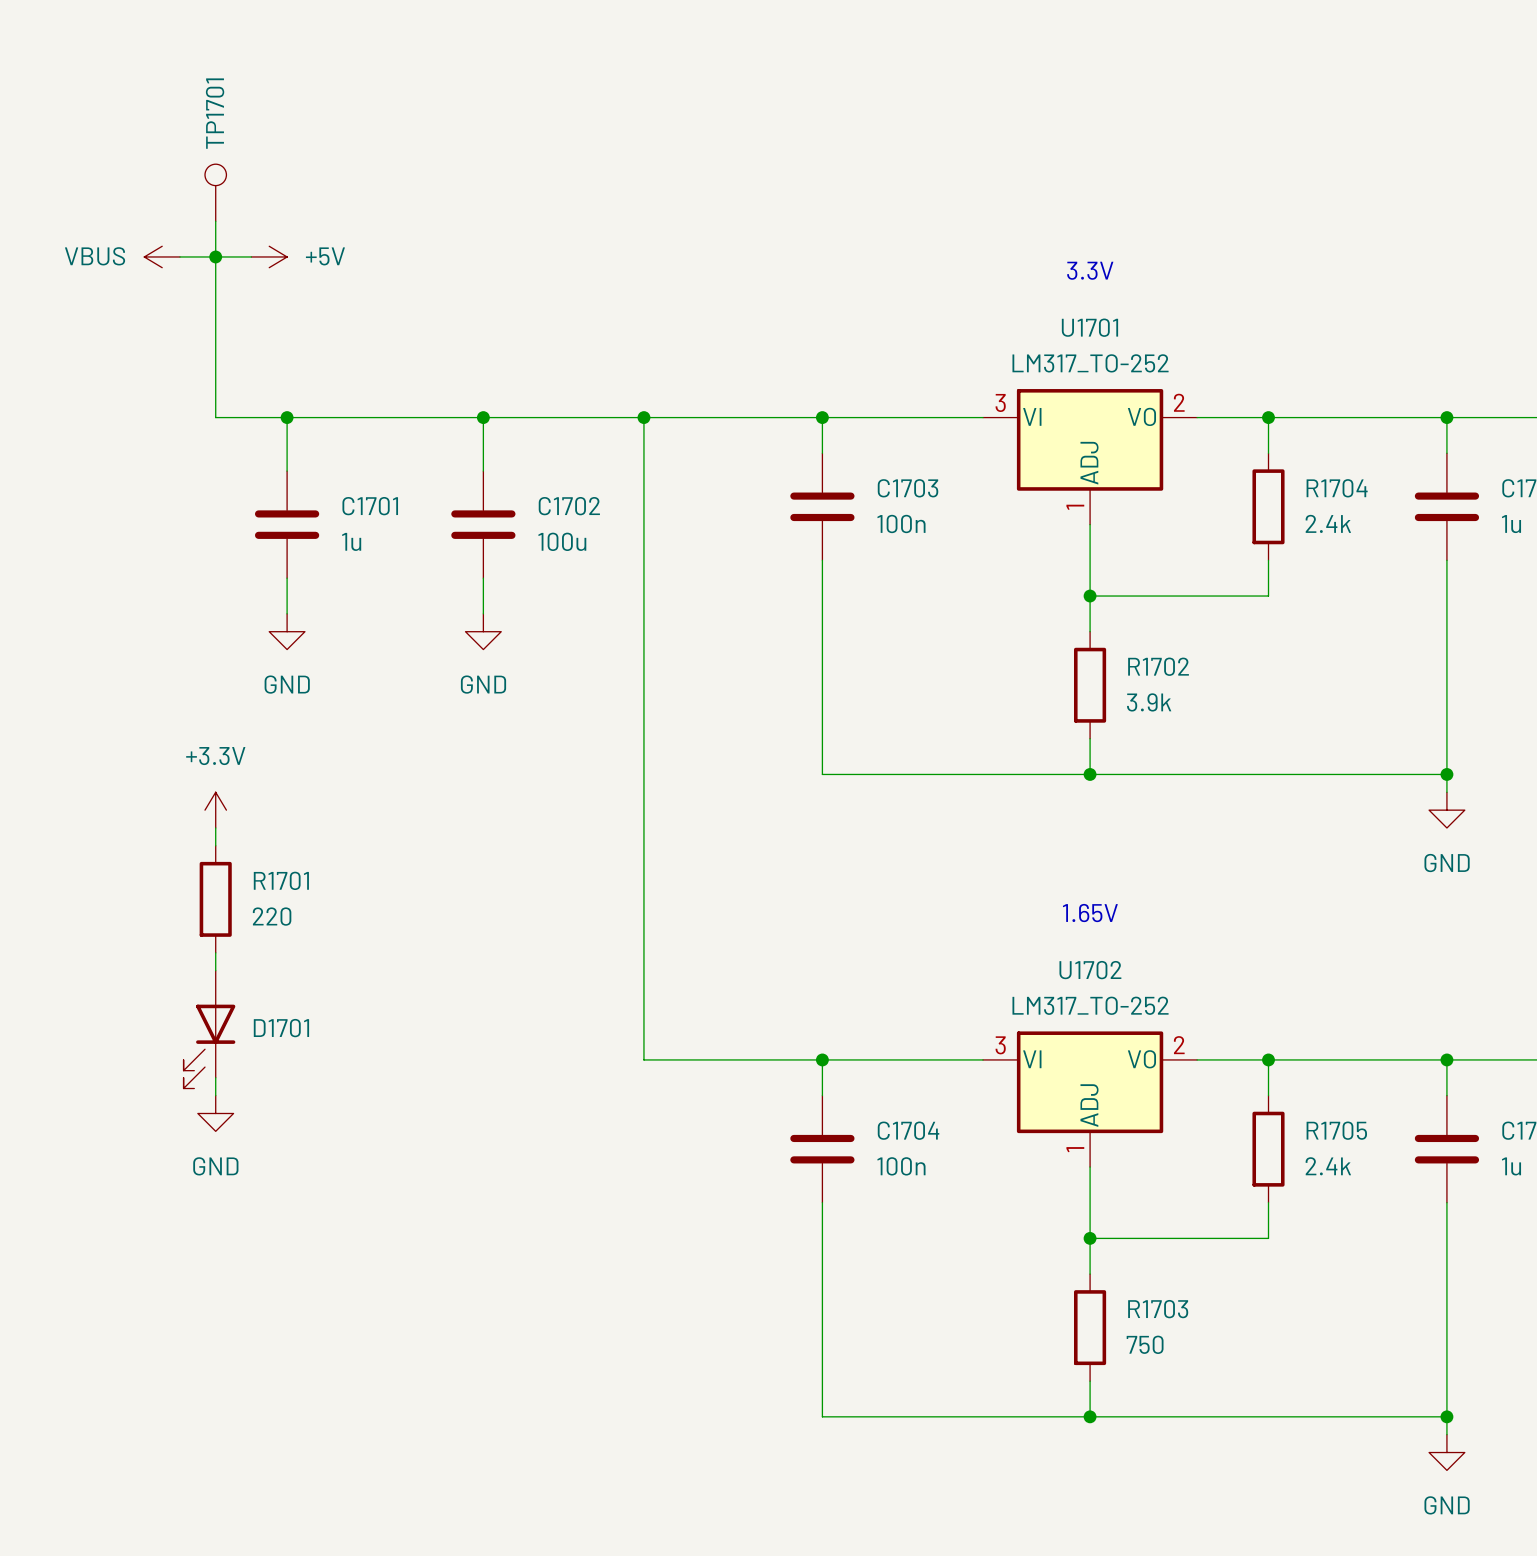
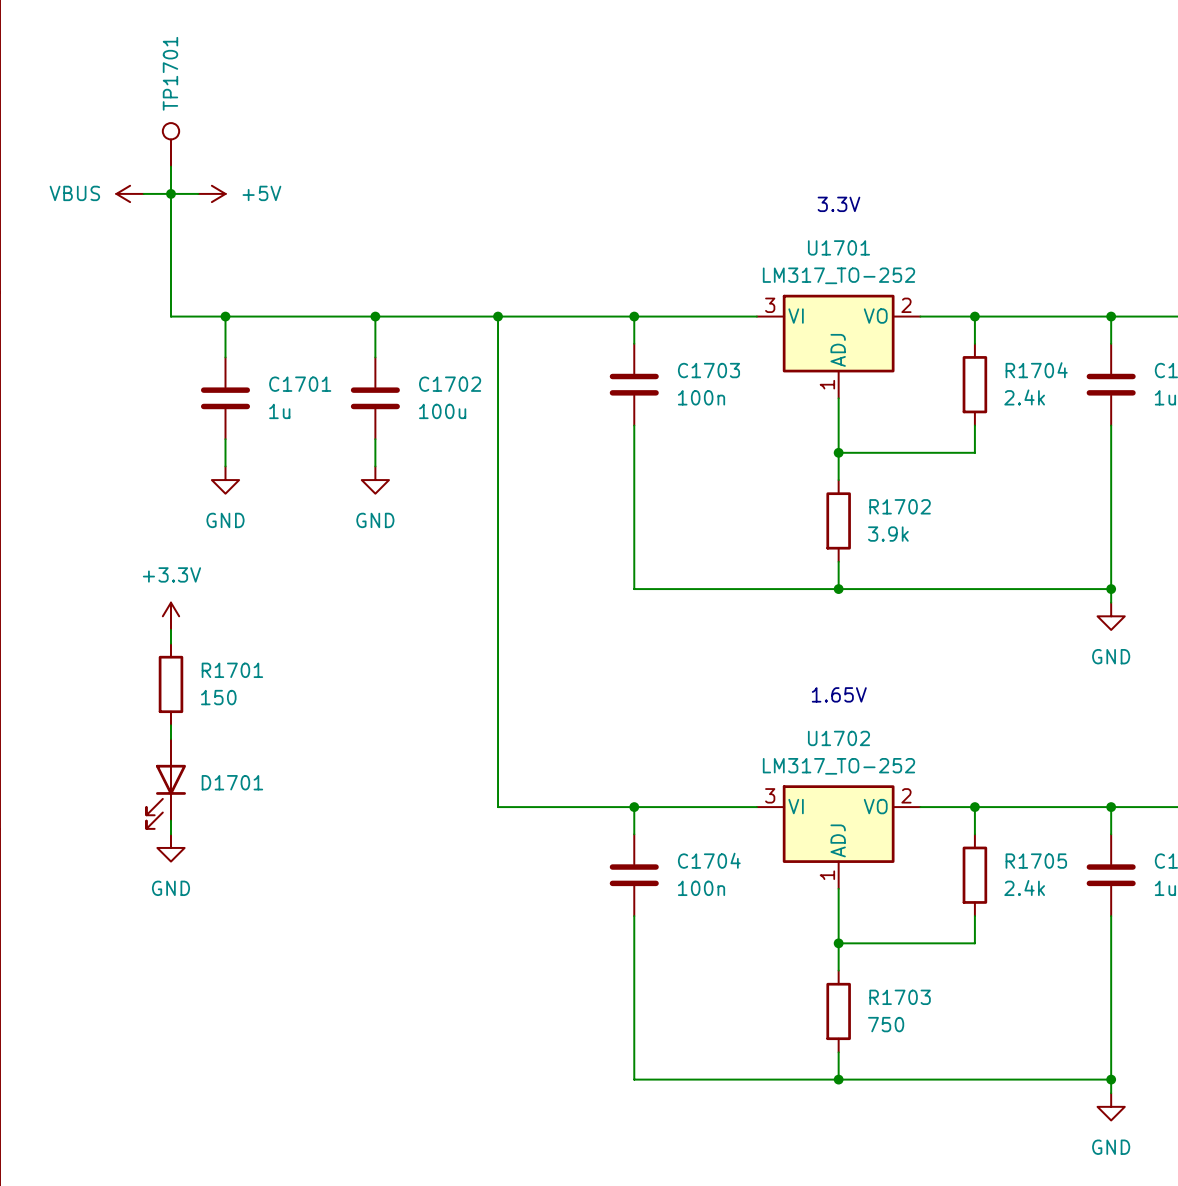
R1701 value: 220 (272, 916) -> 150 (218, 697)

